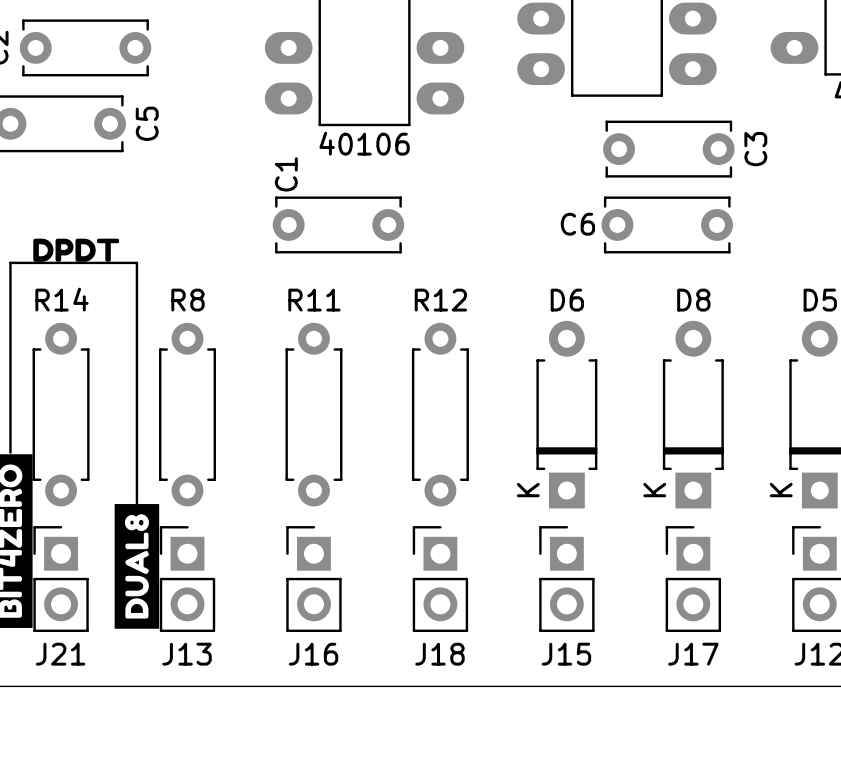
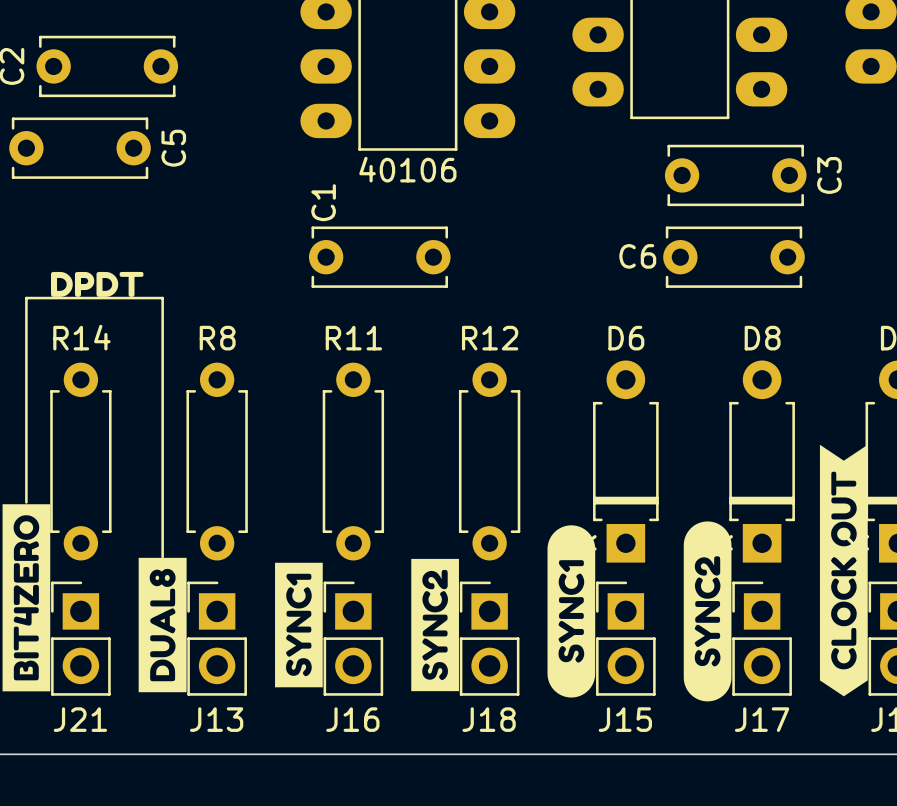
drawing: none -> [819, 444, 868, 697]
drawing: none -> [683, 521, 732, 702]
drawing: none -> [547, 525, 596, 698]
drawing: none -> [411, 558, 459, 692]
drawing: none -> [275, 562, 323, 688]

